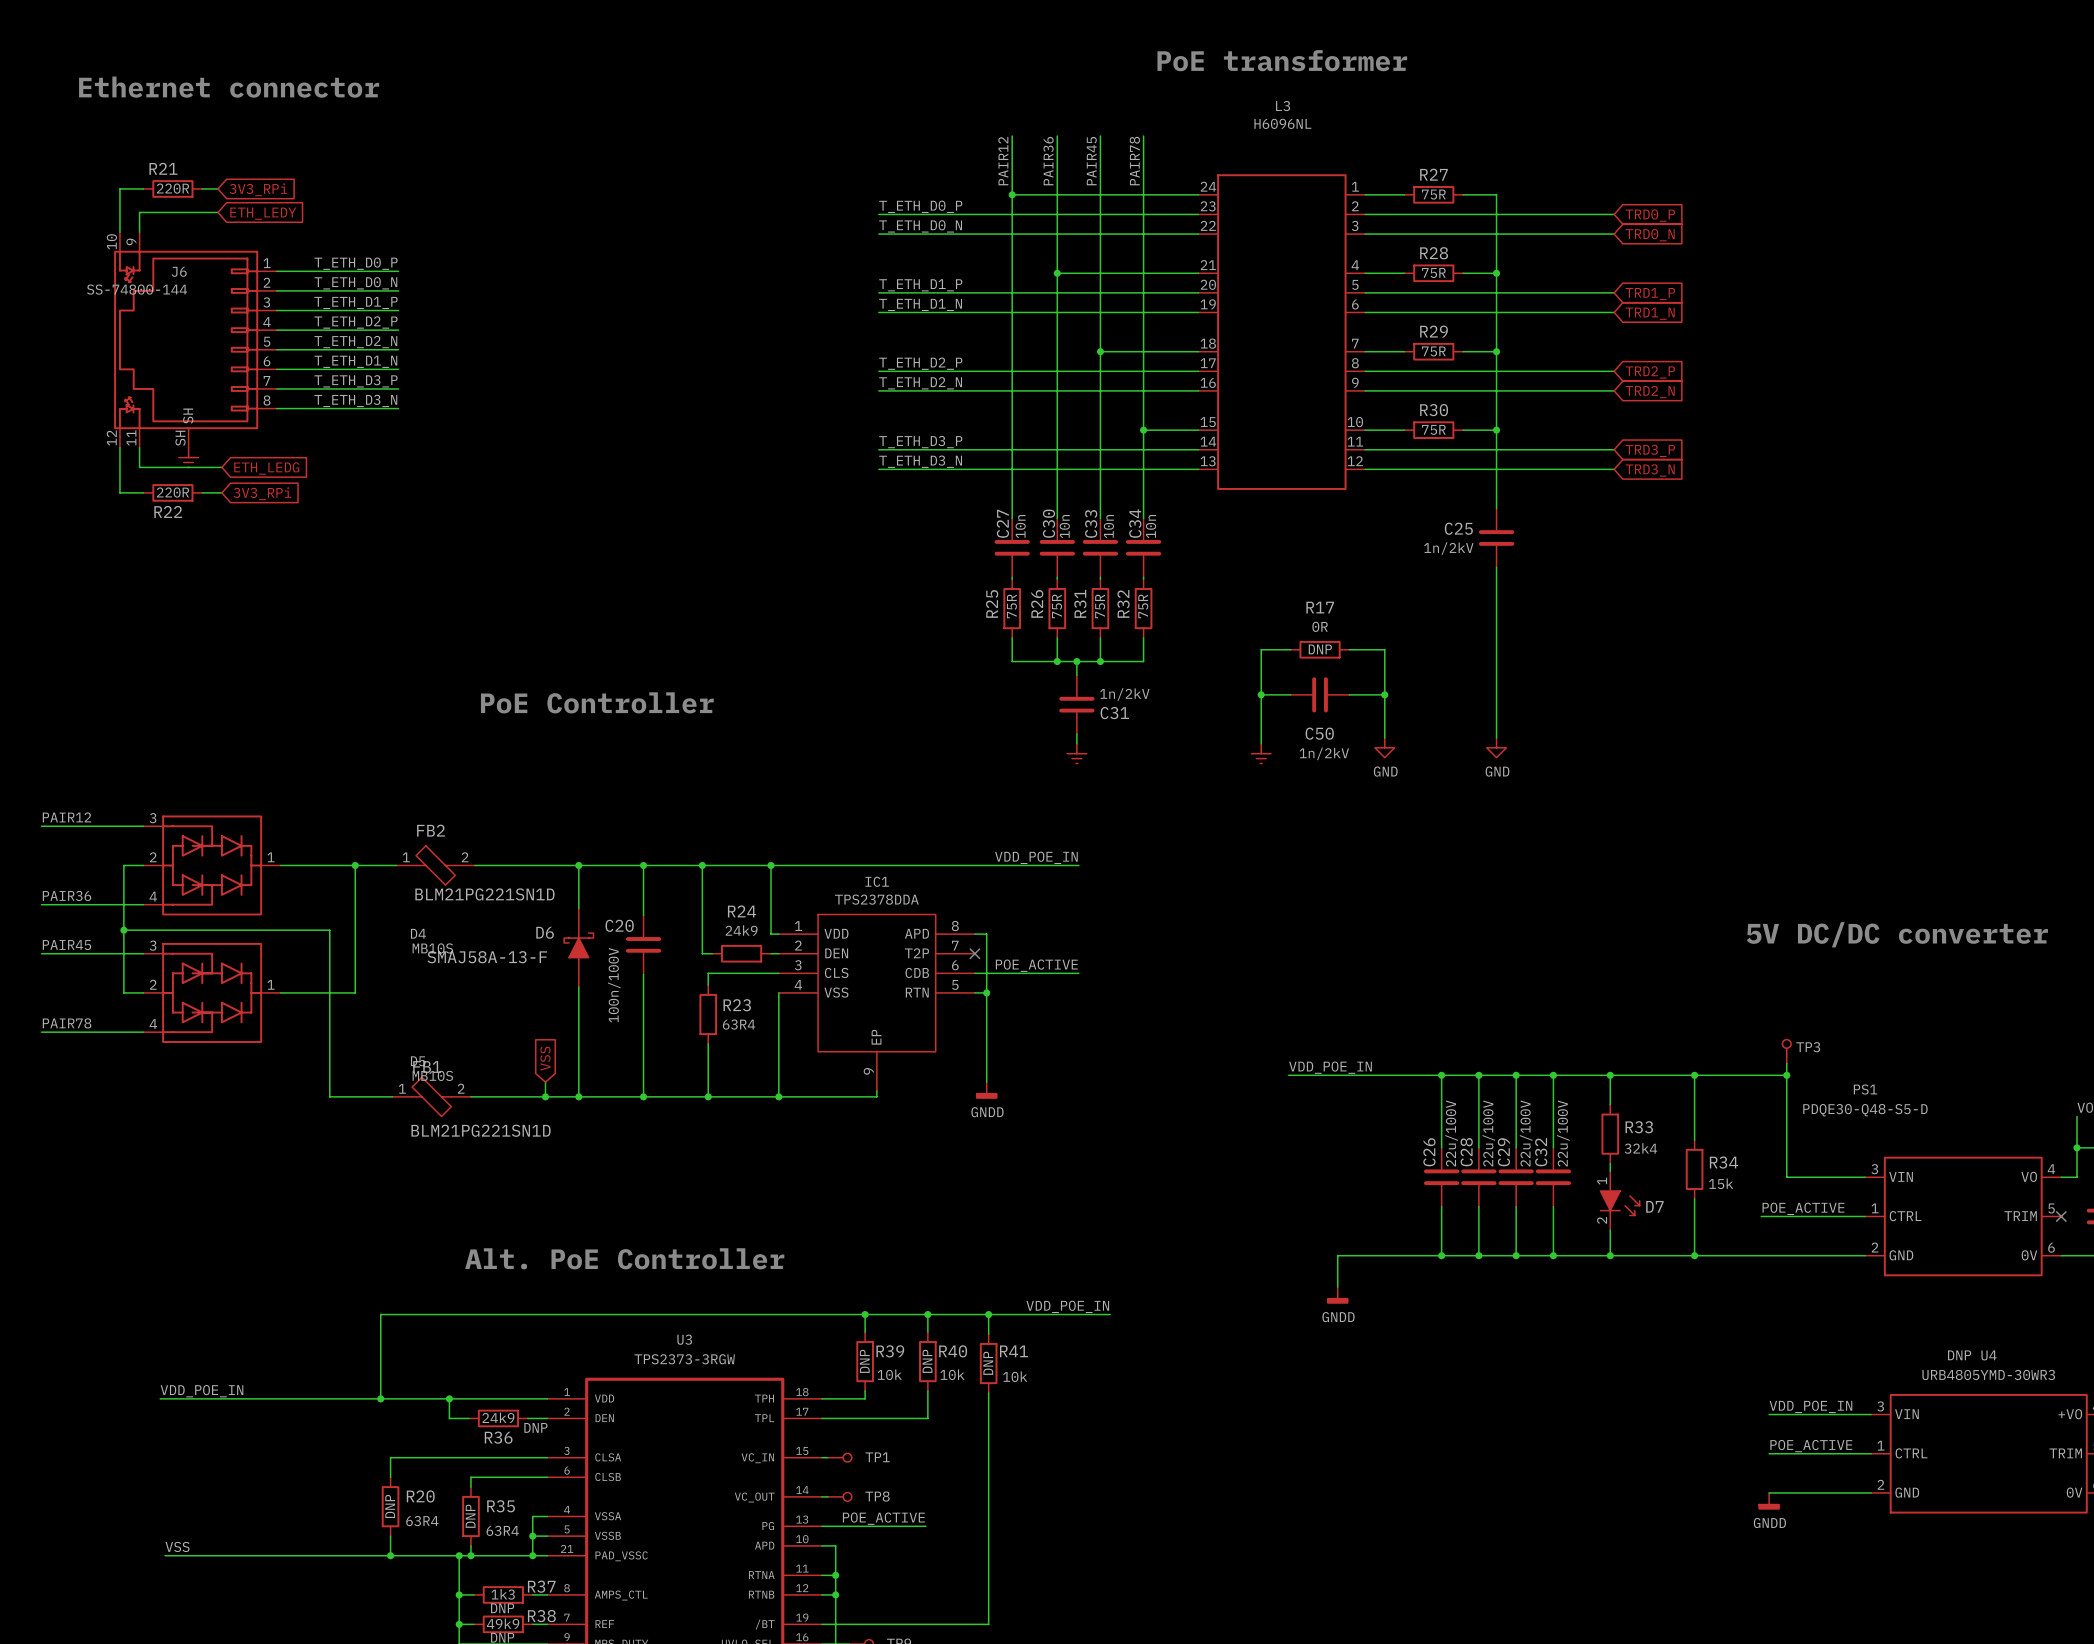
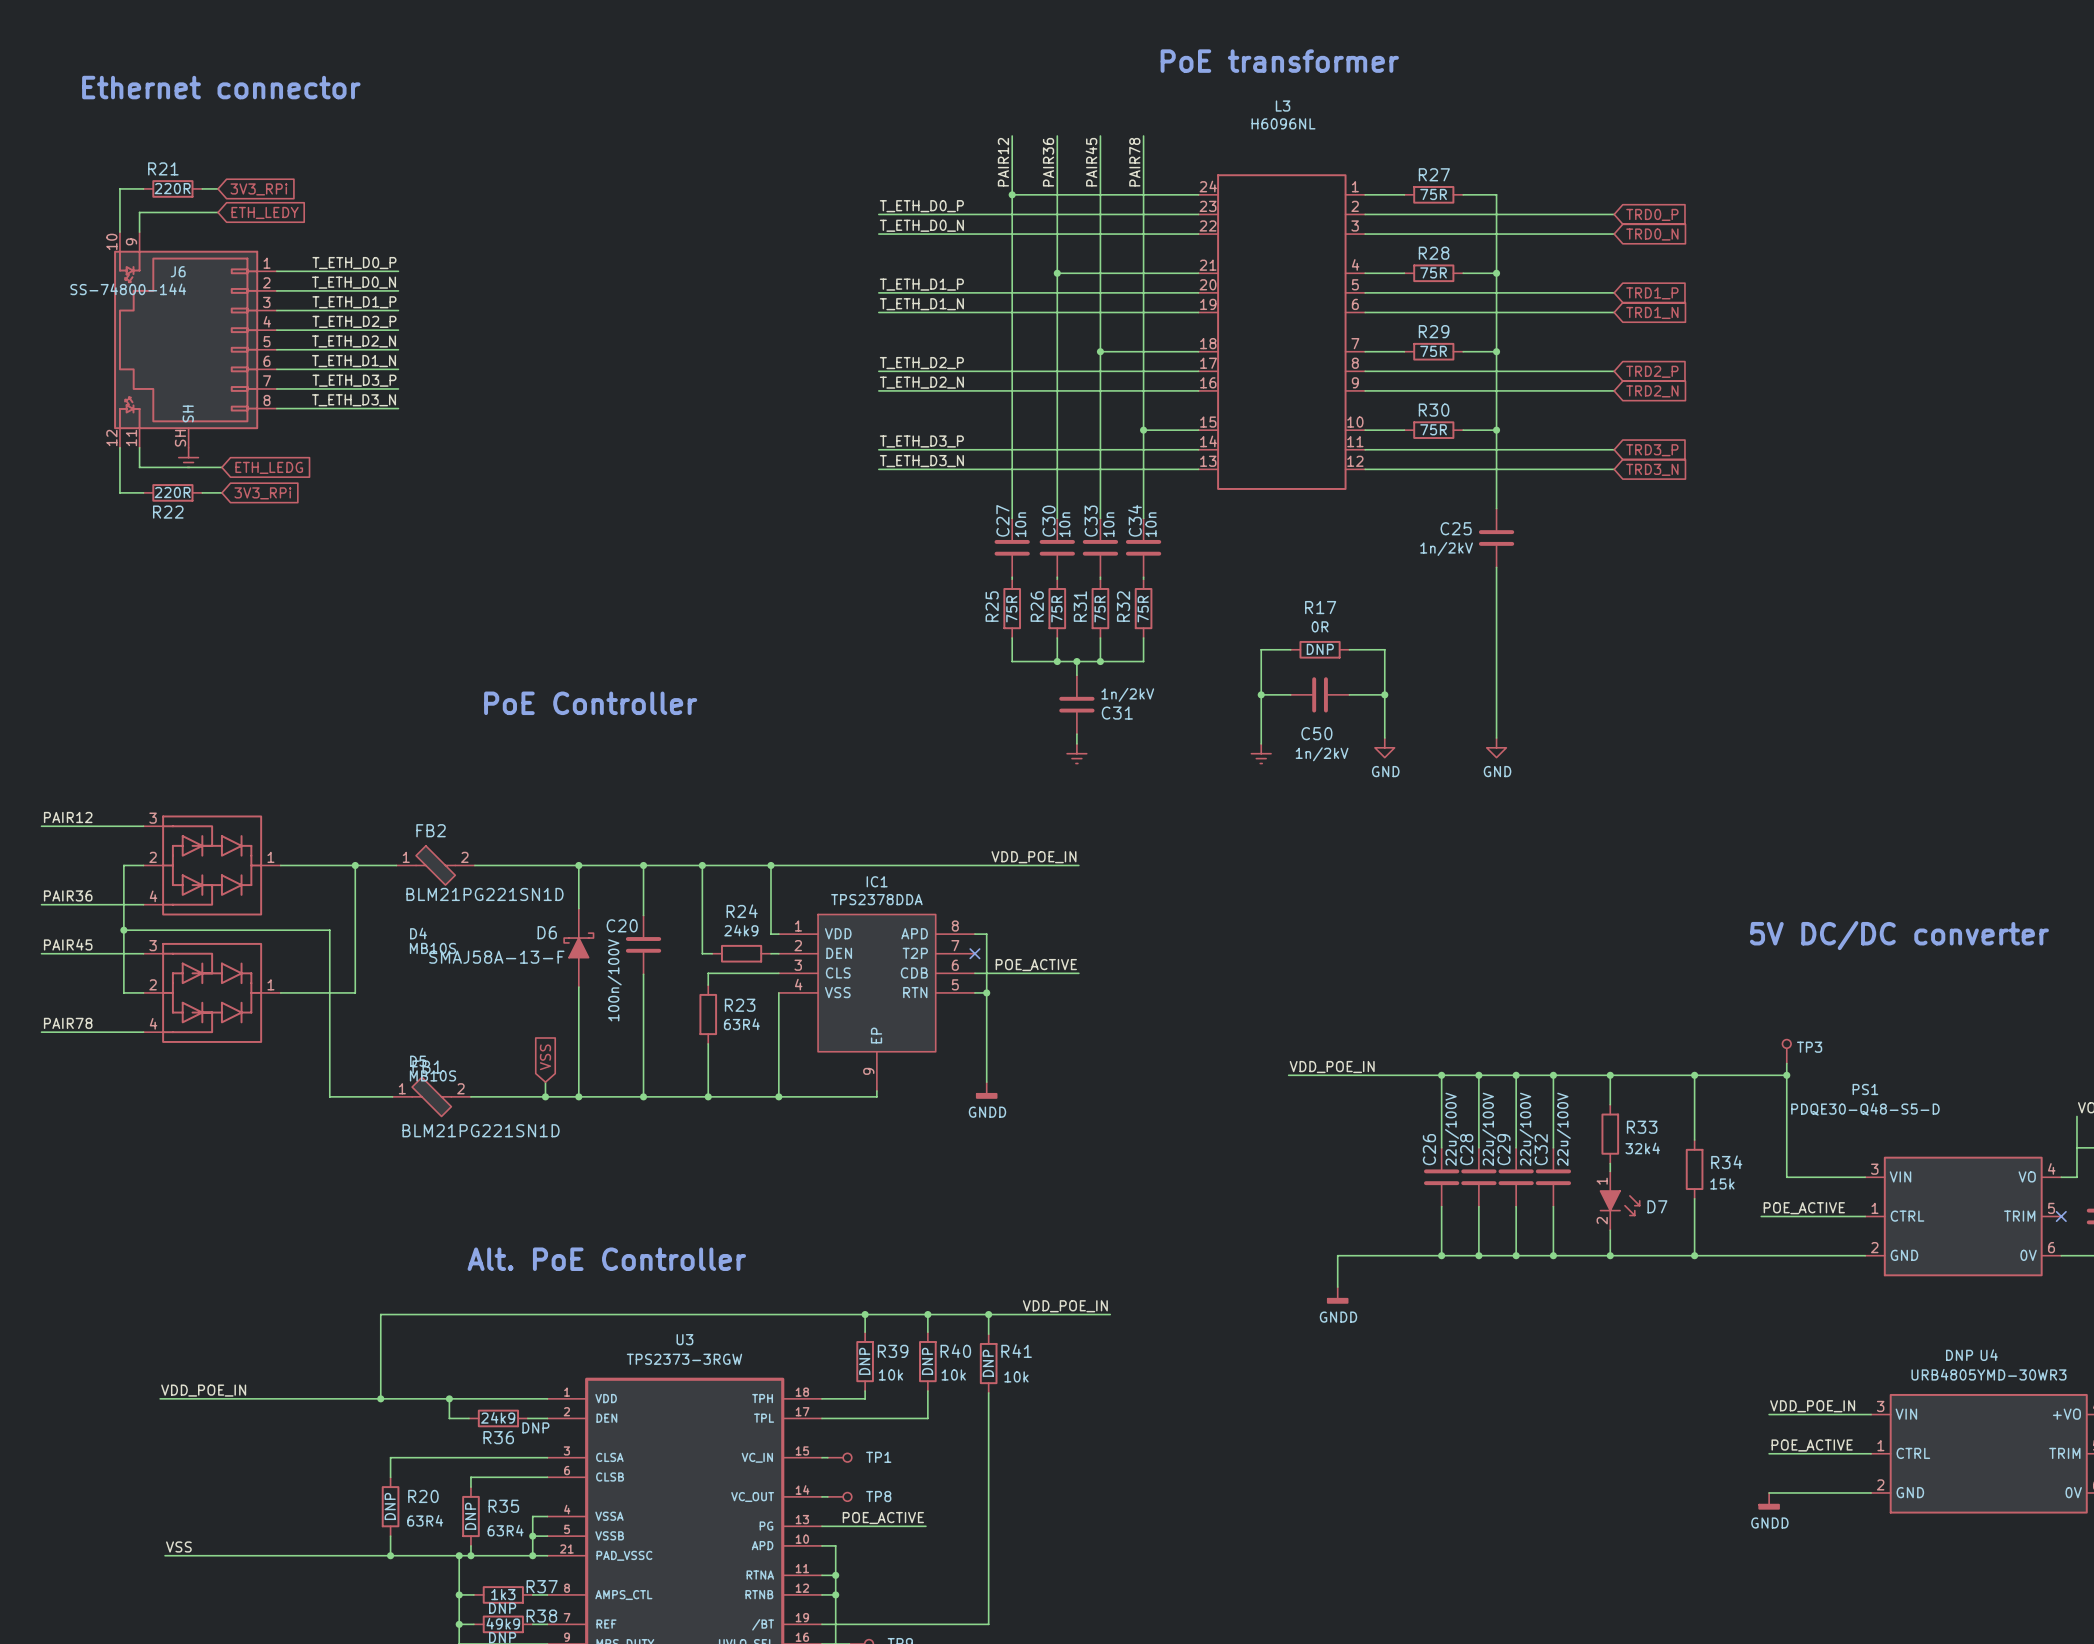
junction: (2076, 1147) -> none

